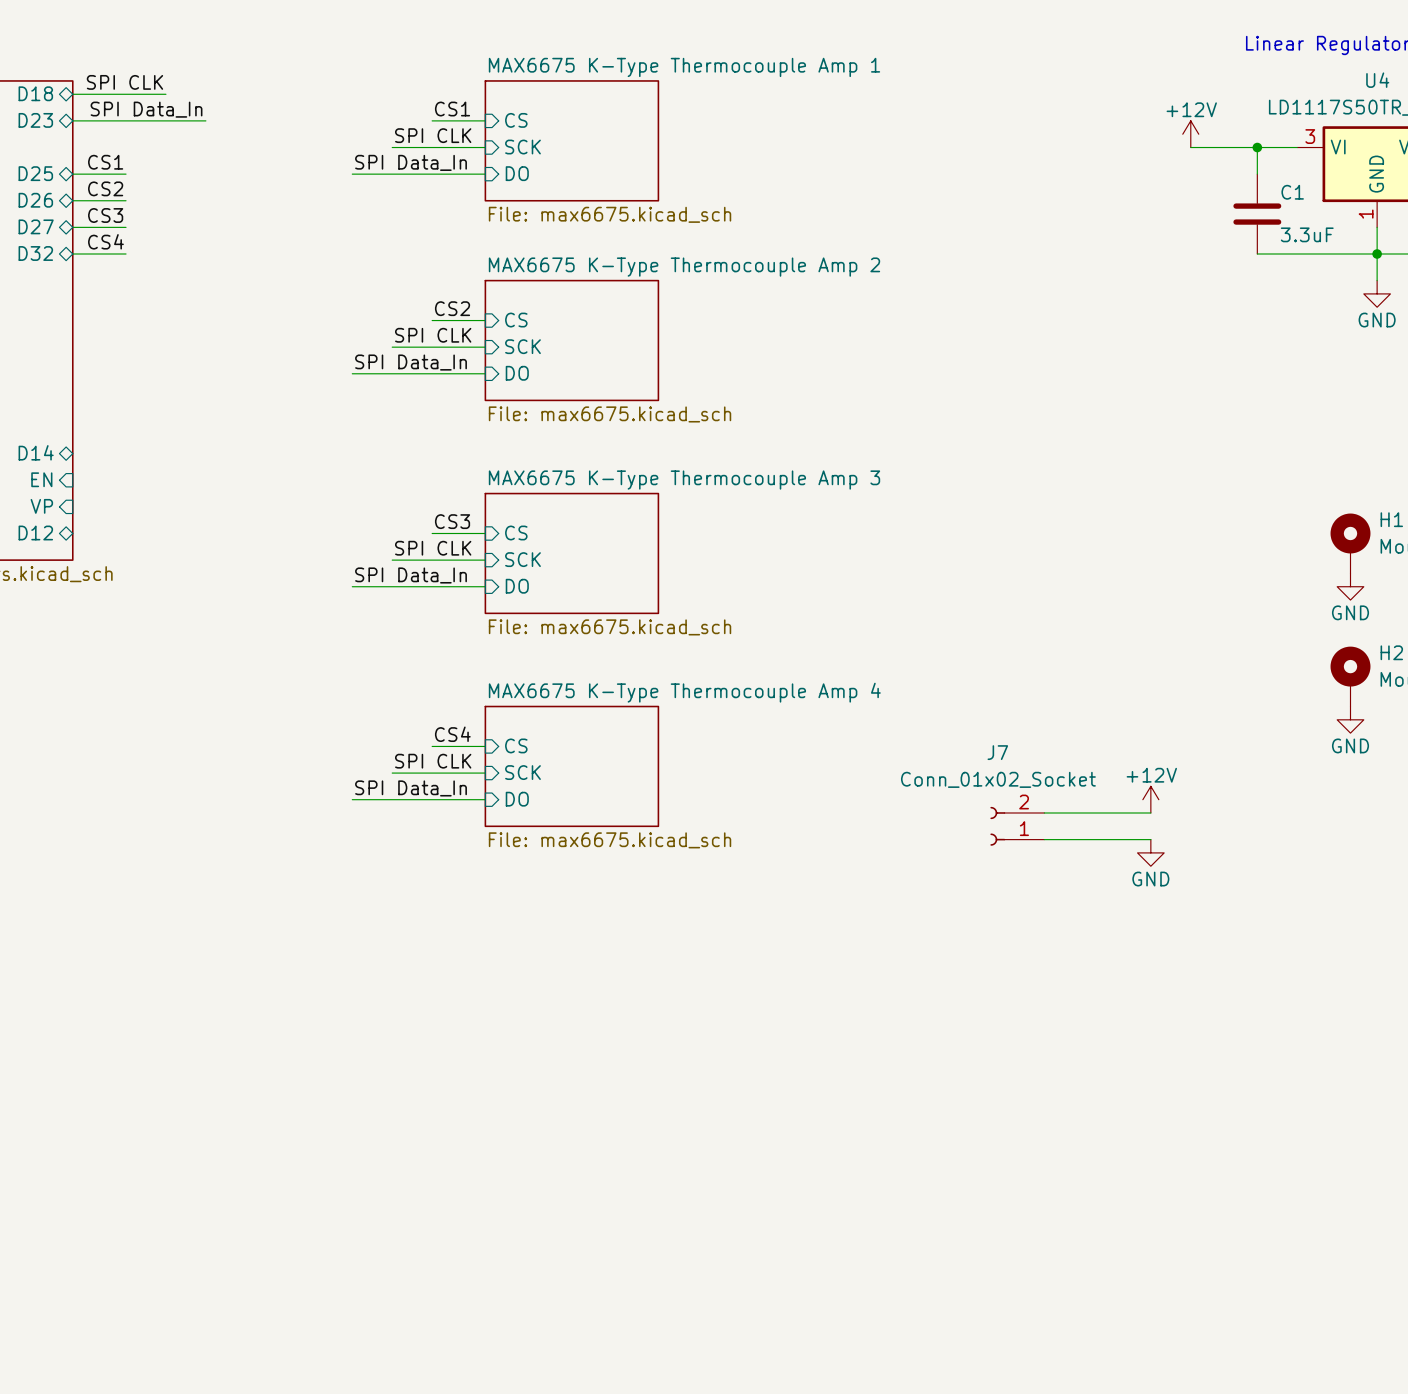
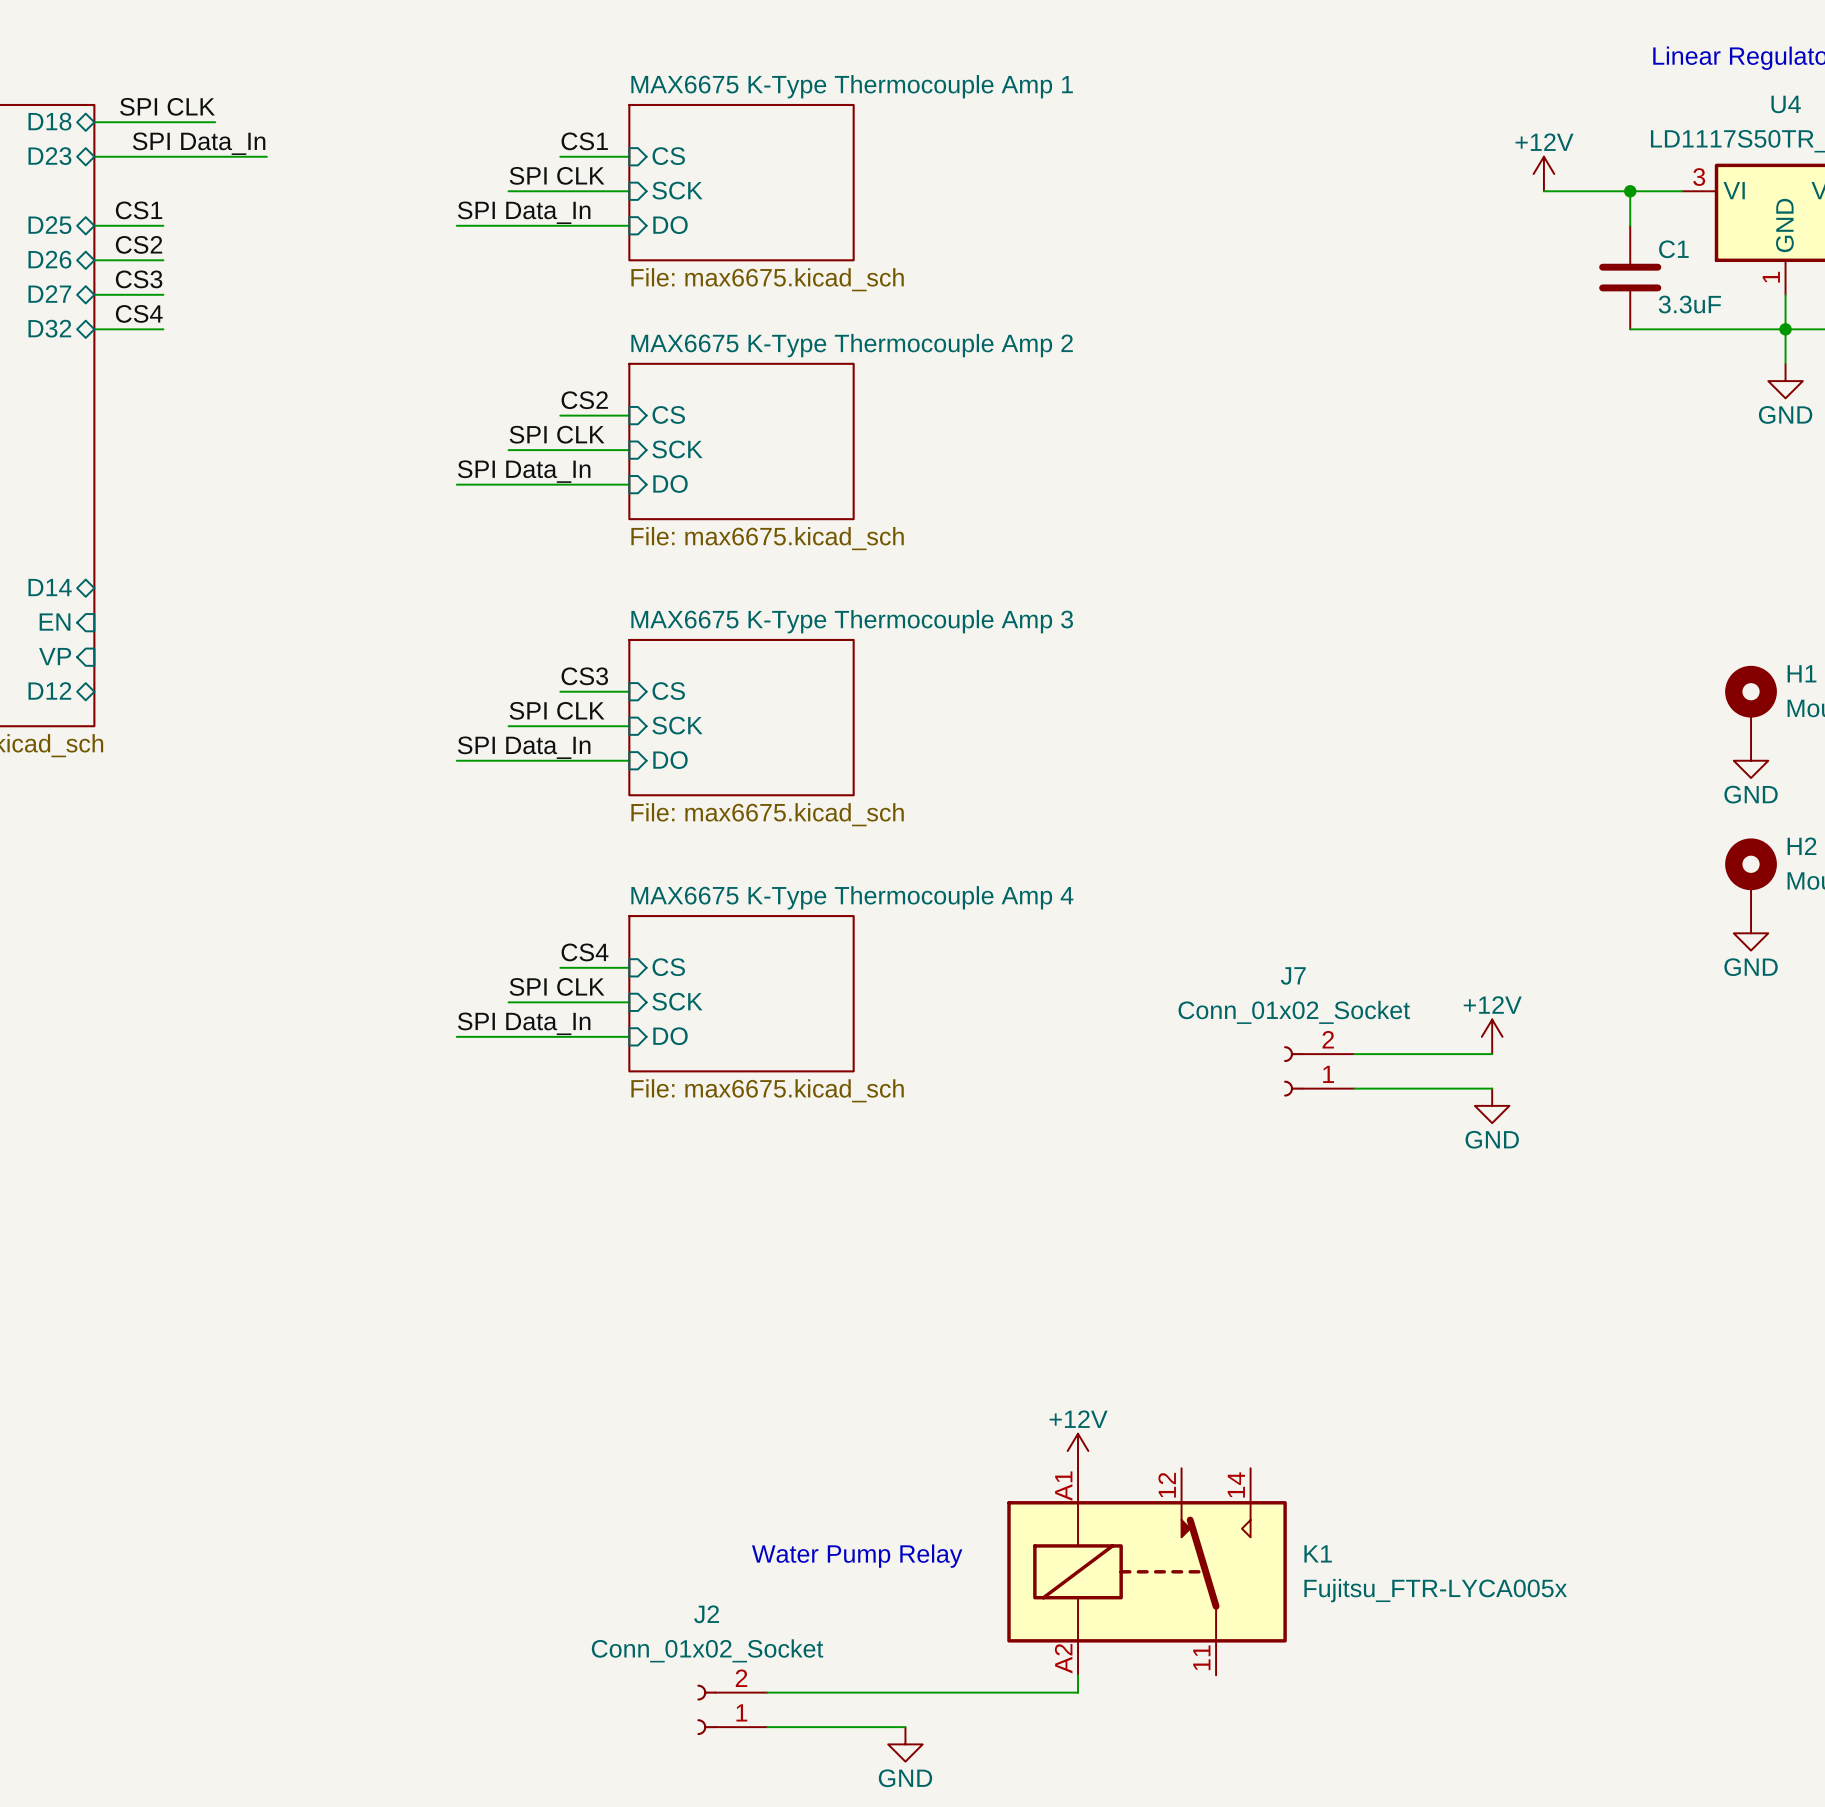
power symbol: none -> +12V (1078, 1451)
text: none -> Water Pump Relay (857, 1556)
K1: none -> Fujitsu_FTR-LYCA005x (1147, 1571)
wire: none -> (1078, 1675) (1078, 1692) (767, 1692)
J2: none -> Conn_01x02_Socket (732, 1709)
wire: none -> (767, 1727) (905, 1727)
power symbol: none -> GND (905, 1744)

